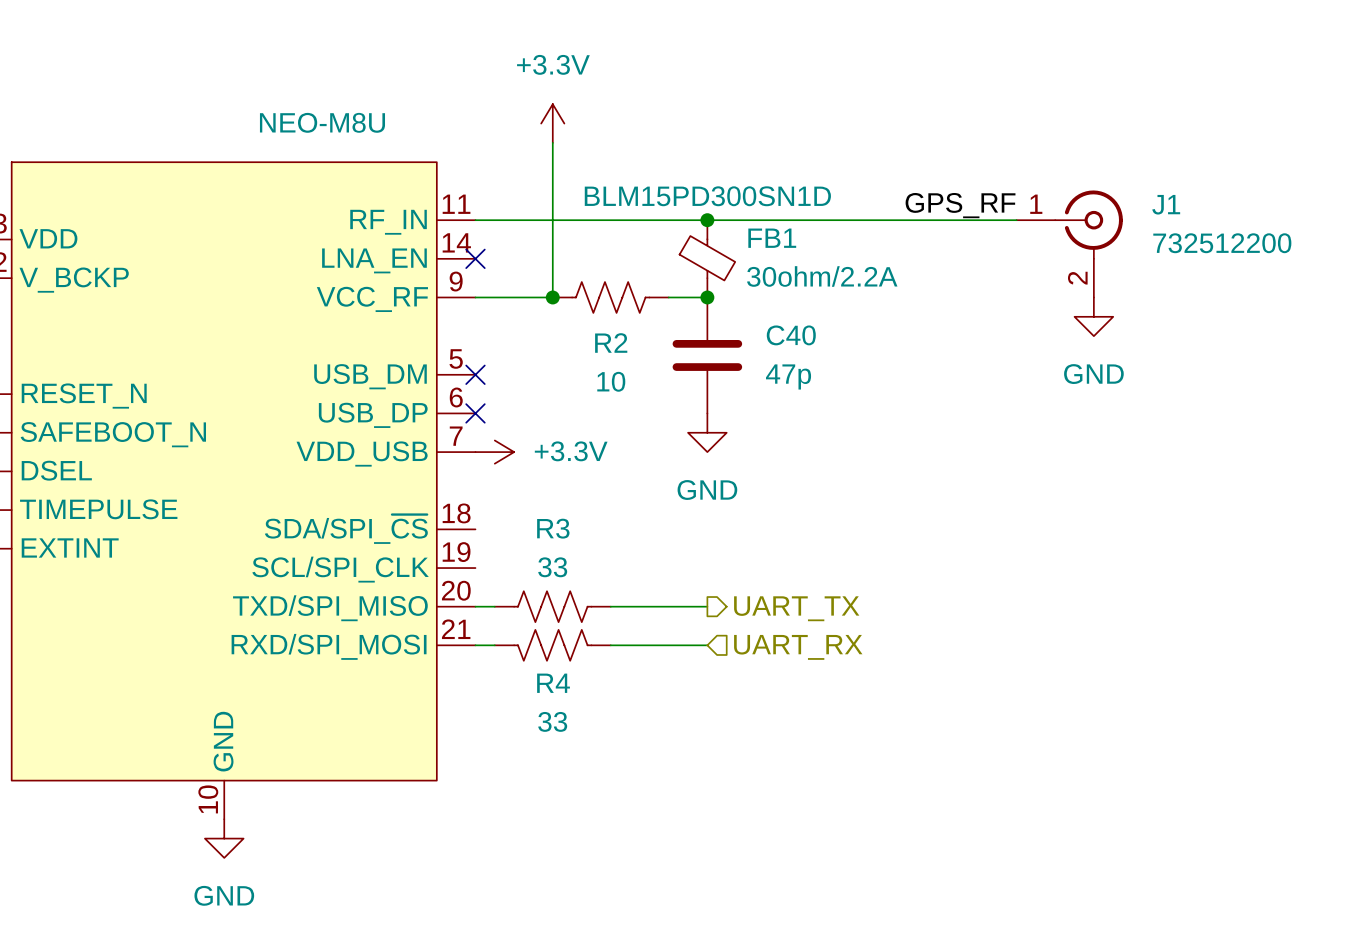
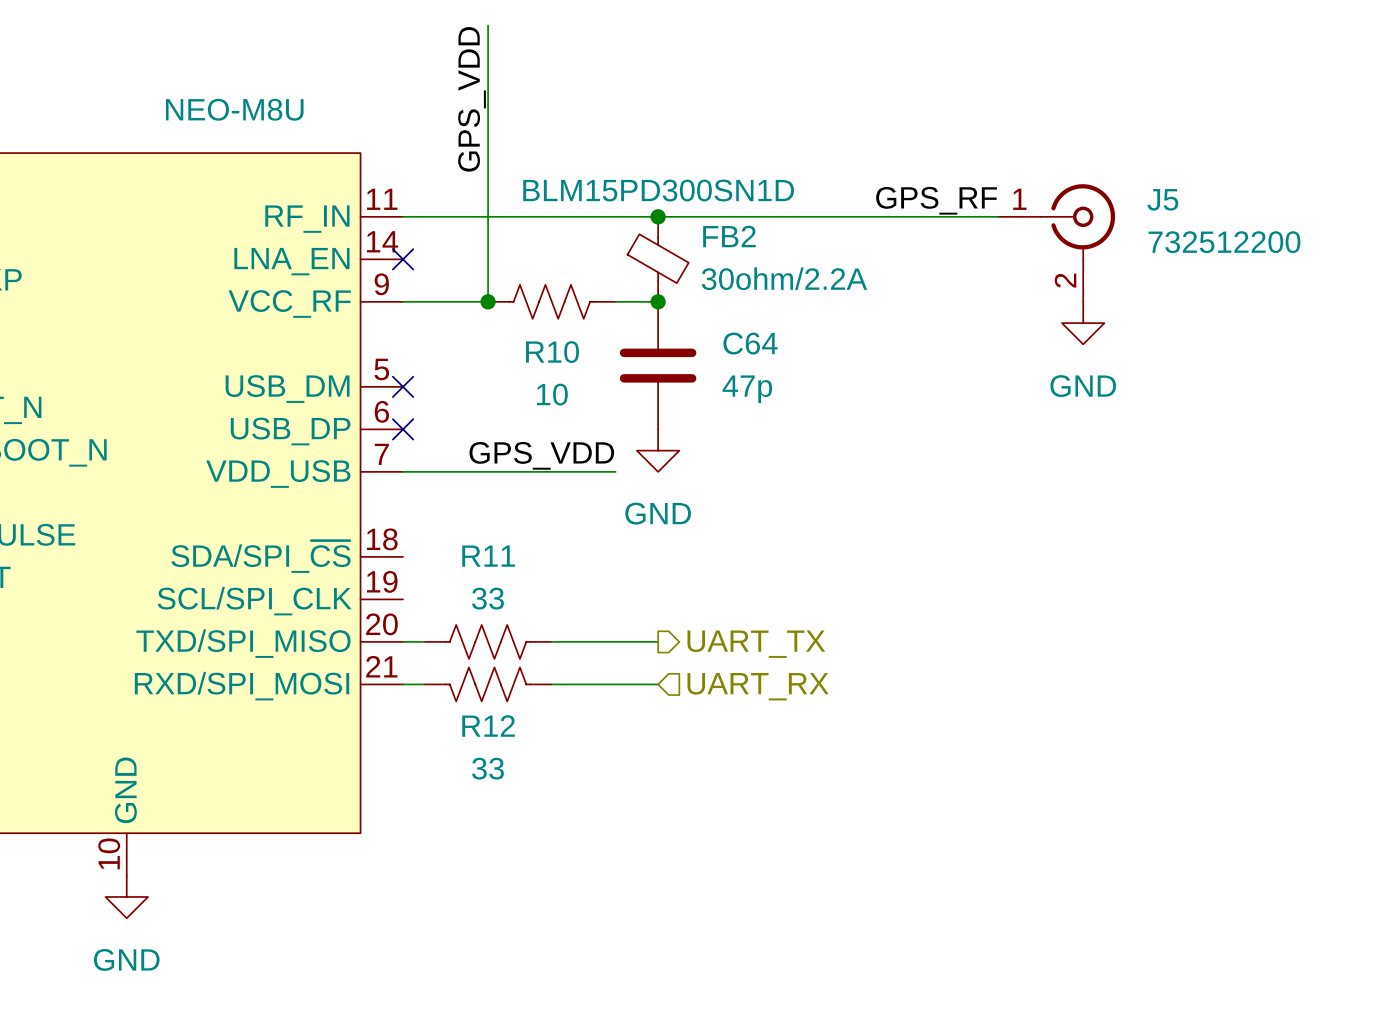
wire: none -> (488, 25) (488, 131)
label: none -> GPS_VDD (472, 99)
power symbol: +3.3V (552, 123) -> none
J1 name: J1 (1166, 204) -> J5 (1162, 199)
FB1 name: FB1 (772, 238) -> FB2 (729, 236)
C40 name: C40 (791, 335) -> C64 (750, 343)
R2 name: R2 (611, 342) -> R10 (552, 352)
label: none -> GPS_VDD (541, 455)
wire: none -> (403, 471) (615, 471)
power symbol: +3.3V (494, 452) -> none
R3 name: R3 (553, 528) -> R11 (488, 556)
R4 name: R4 (553, 683) -> R12 (488, 725)

